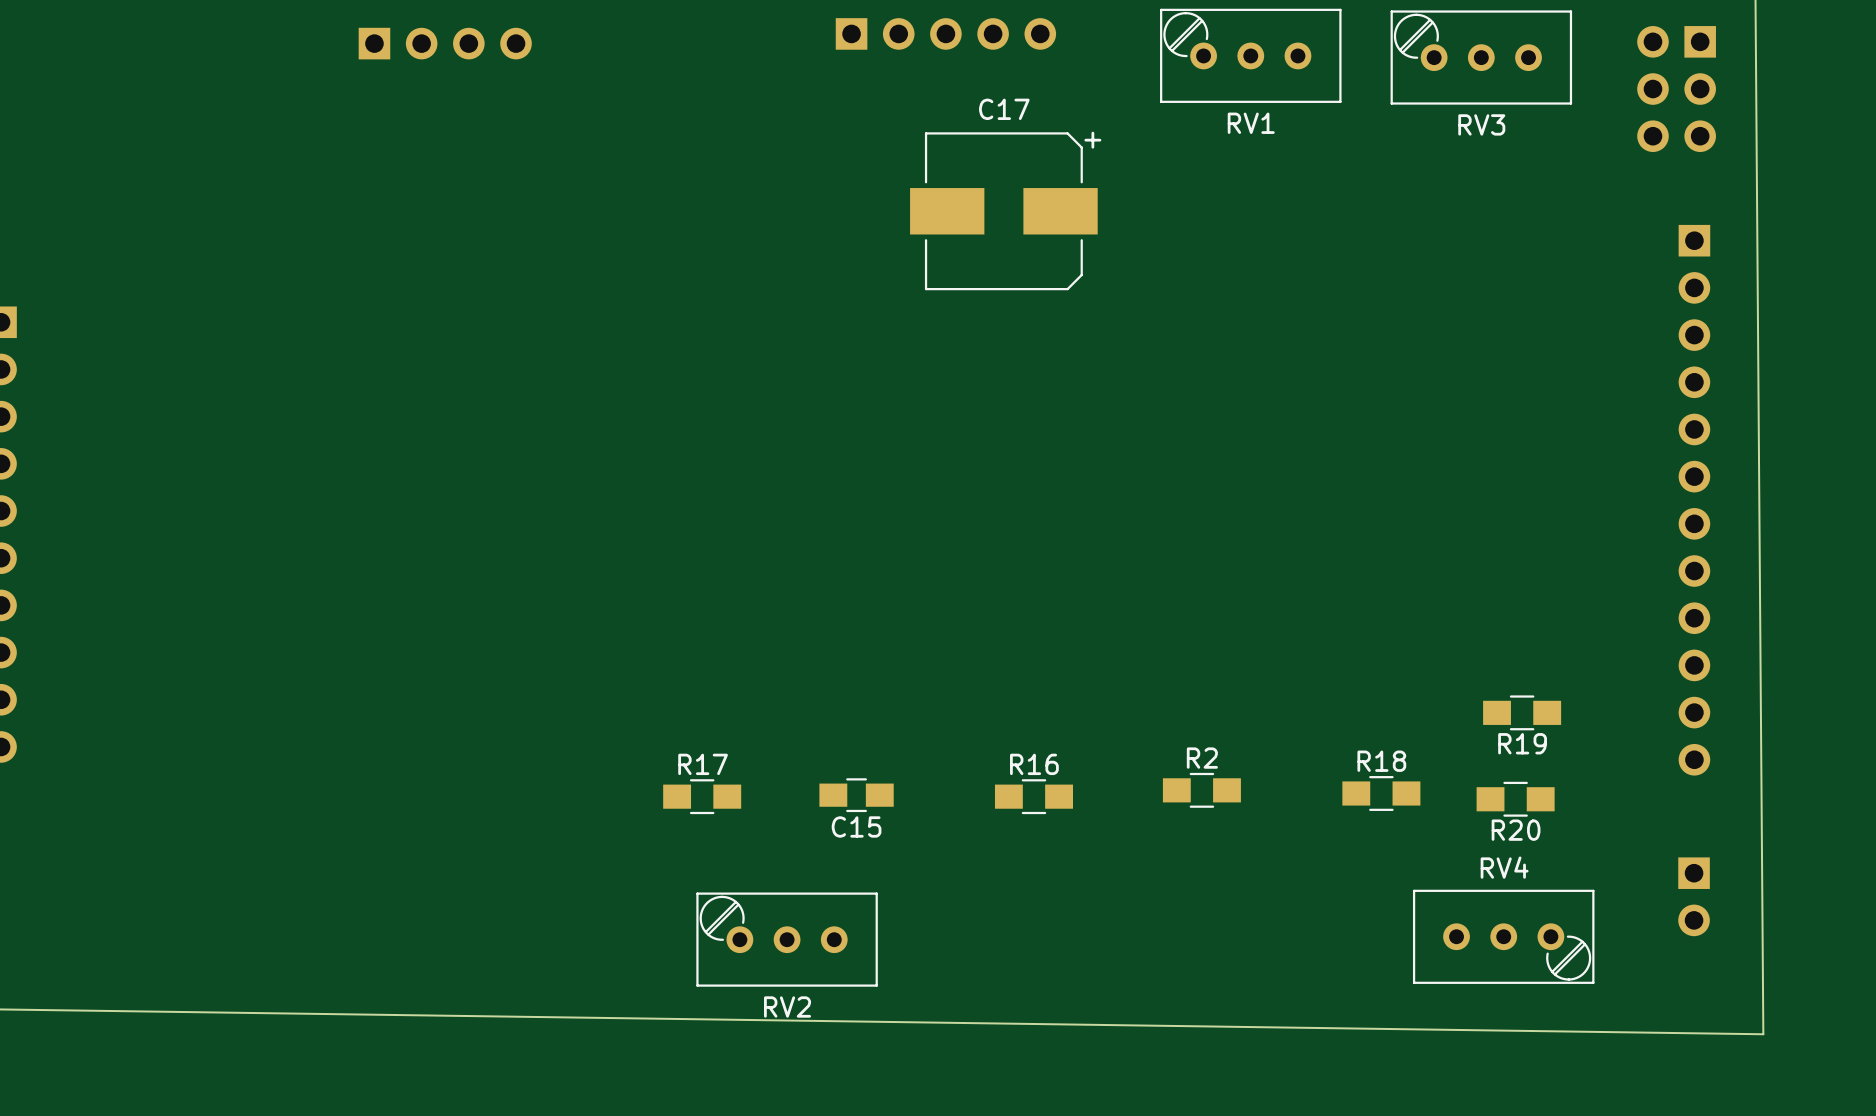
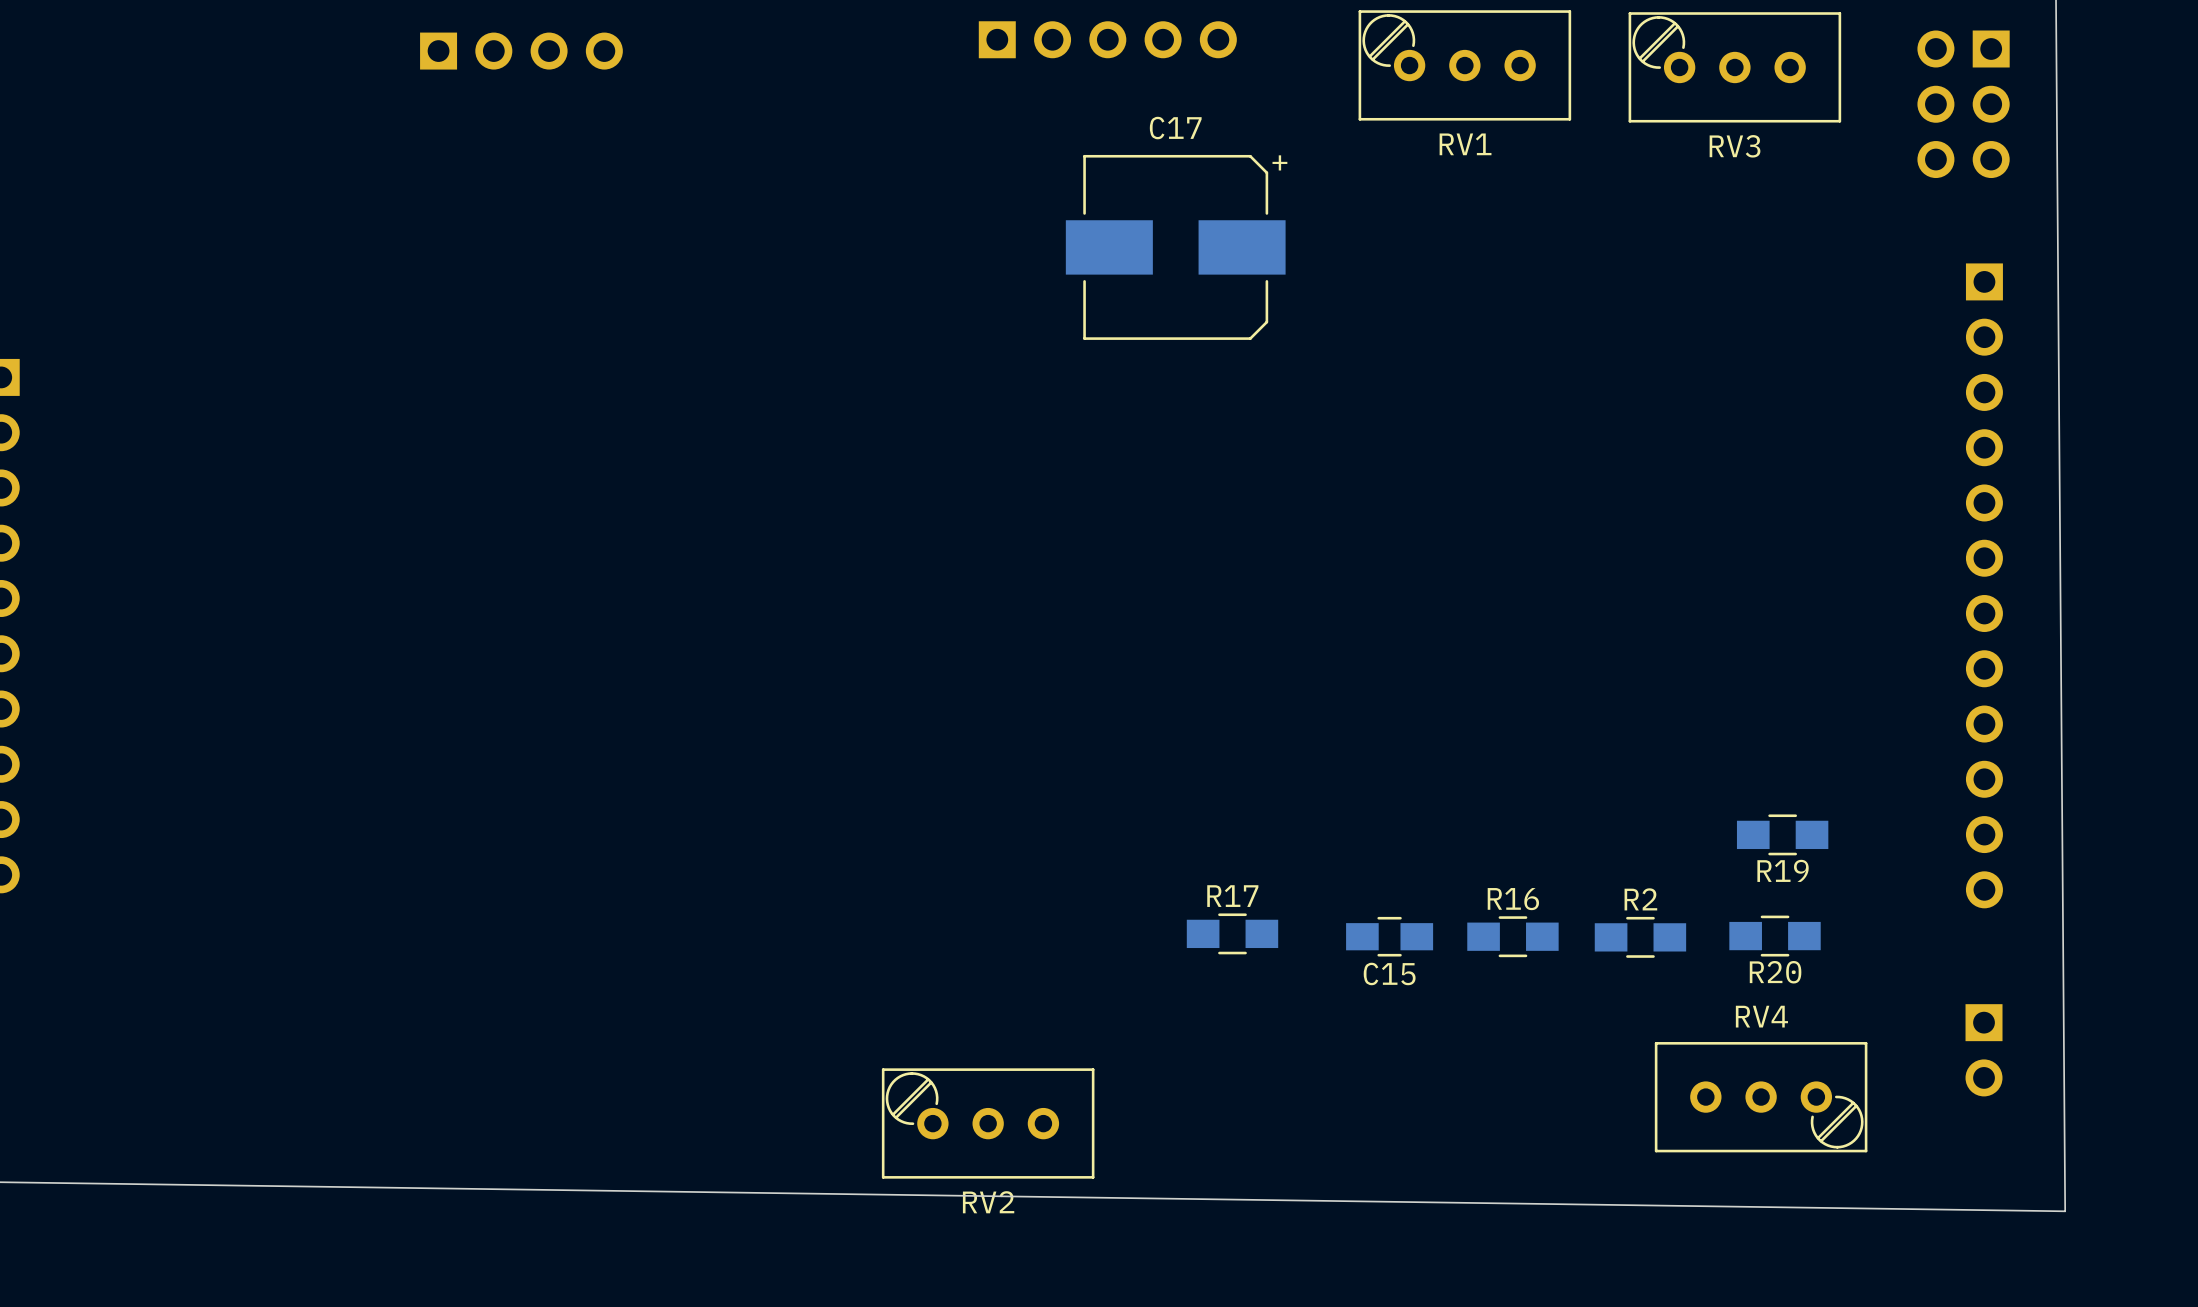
R2 position: (1201, 790) -> (1640, 937)
R18: (1381, 793) -> none
C15 position: (856, 795) -> (1389, 936)
R17 position: (702, 796) -> (1232, 933)
R16 position: (1033, 796) -> (1512, 936)
RV2 position: (787, 939) -> (988, 1123)

